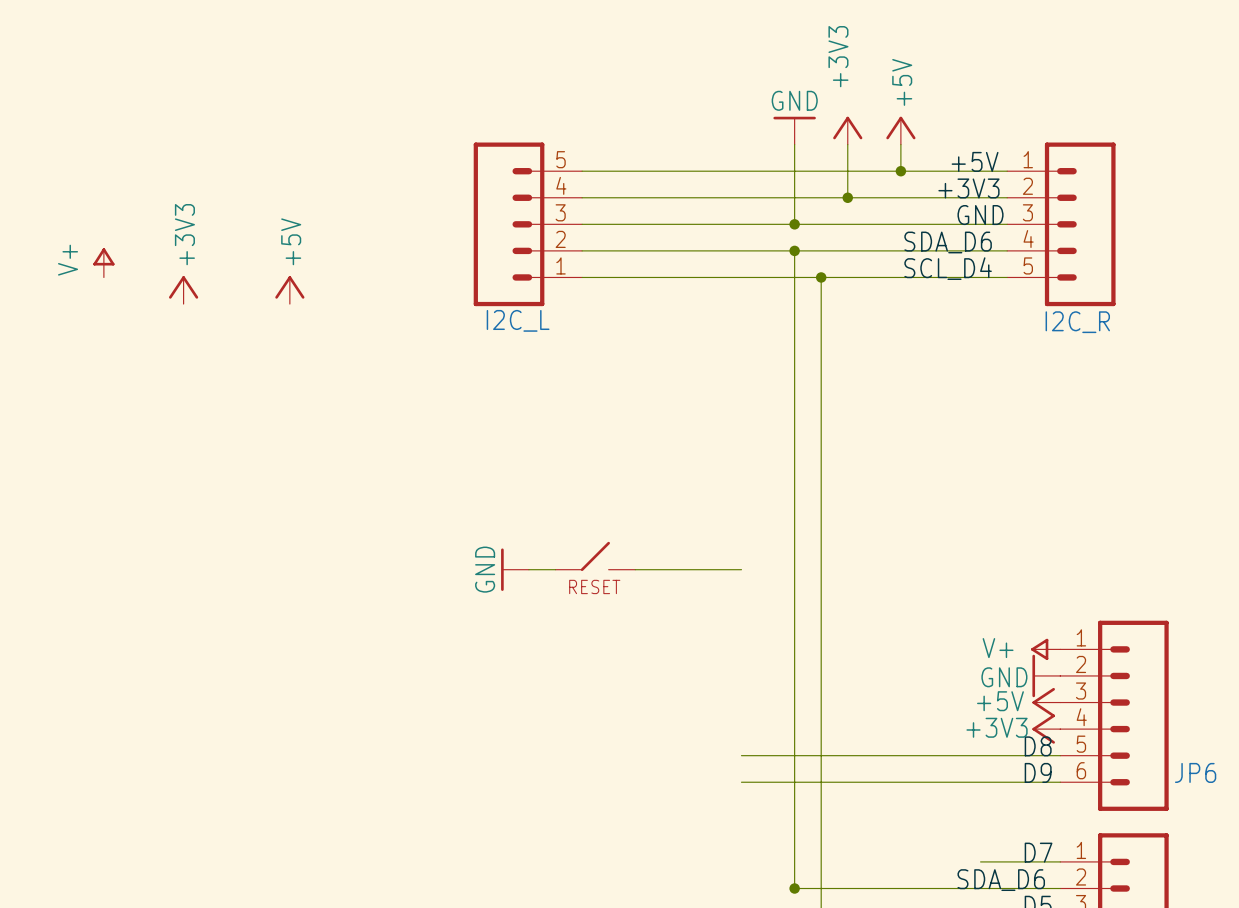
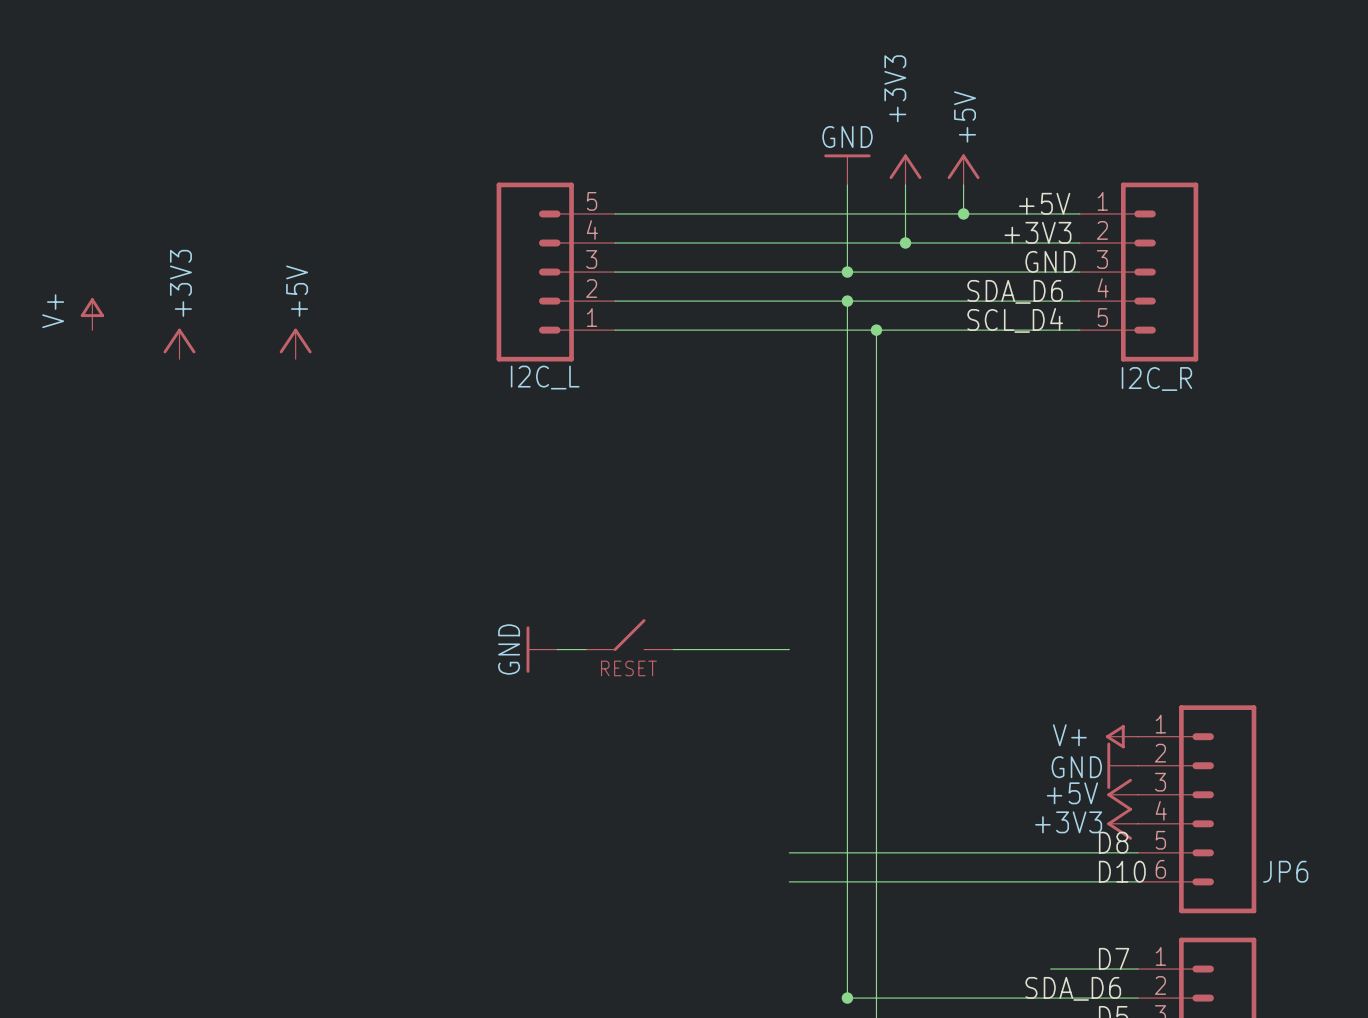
label: D9 (1038, 772) -> D10 (1122, 871)

